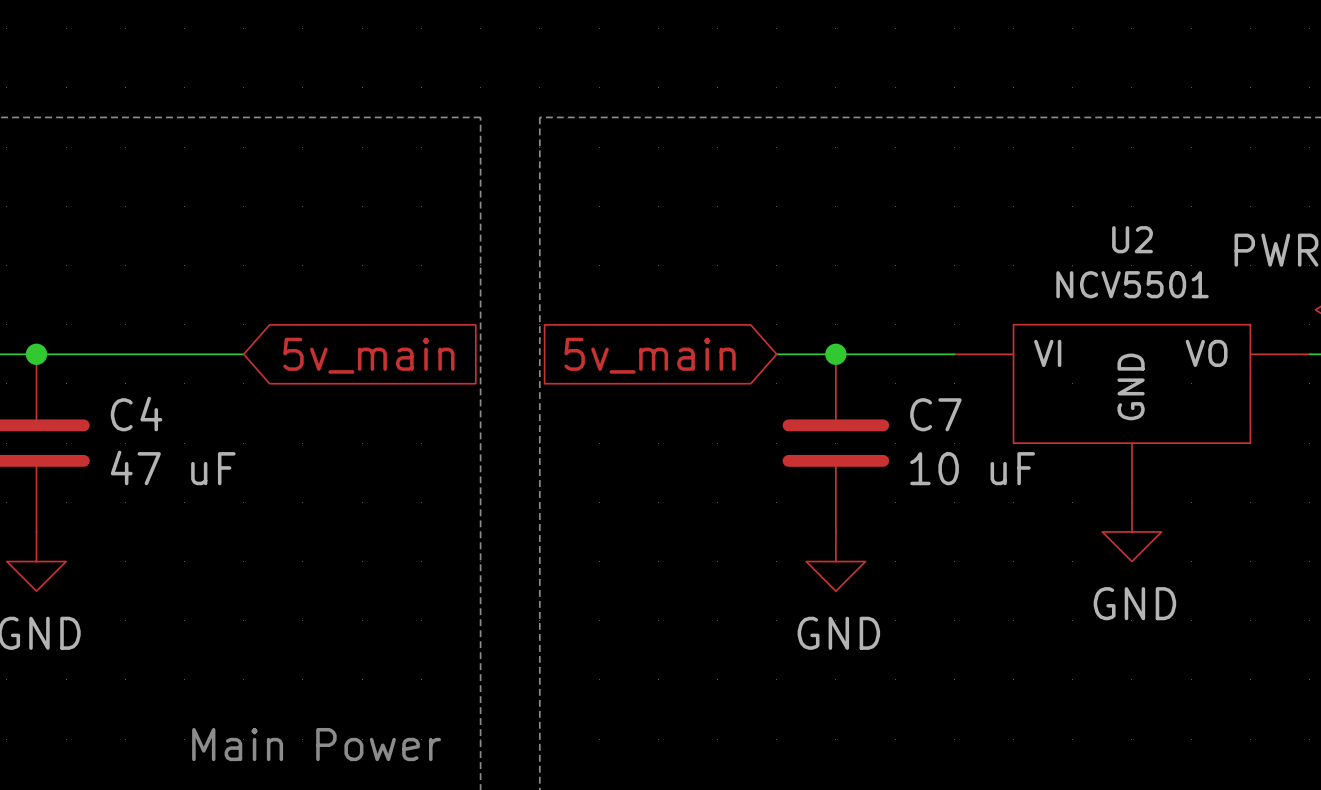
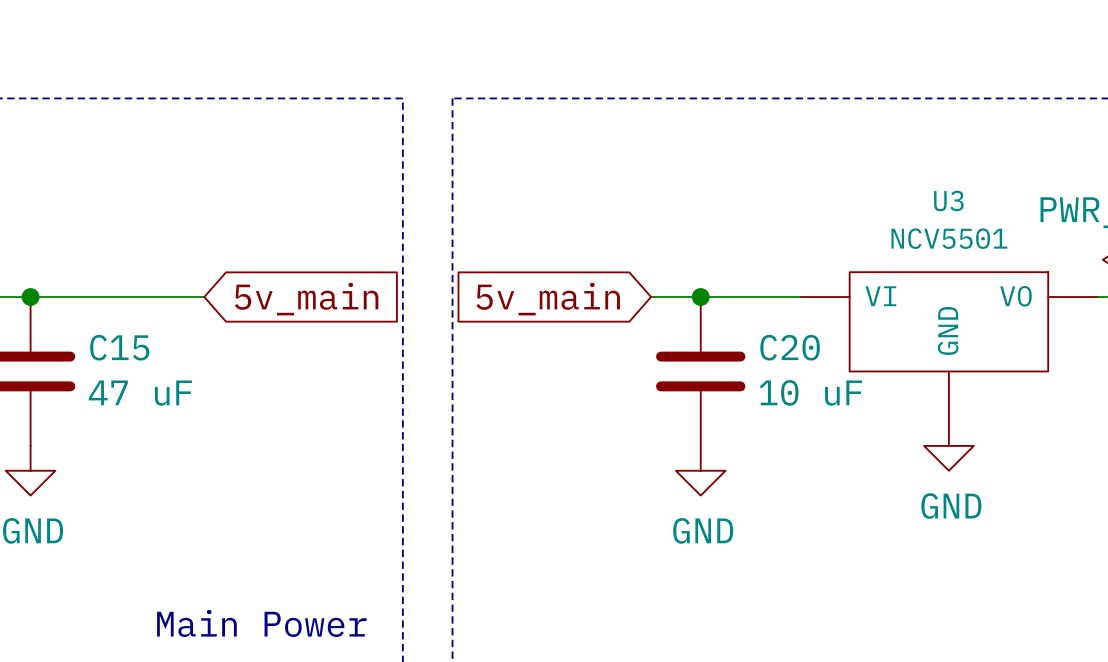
U2 name: U2 (1132, 239) -> U3 (948, 200)
C4 name: C4 (136, 414) -> C15 (119, 347)
C7 name: C7 (935, 414) -> C20 (790, 347)

